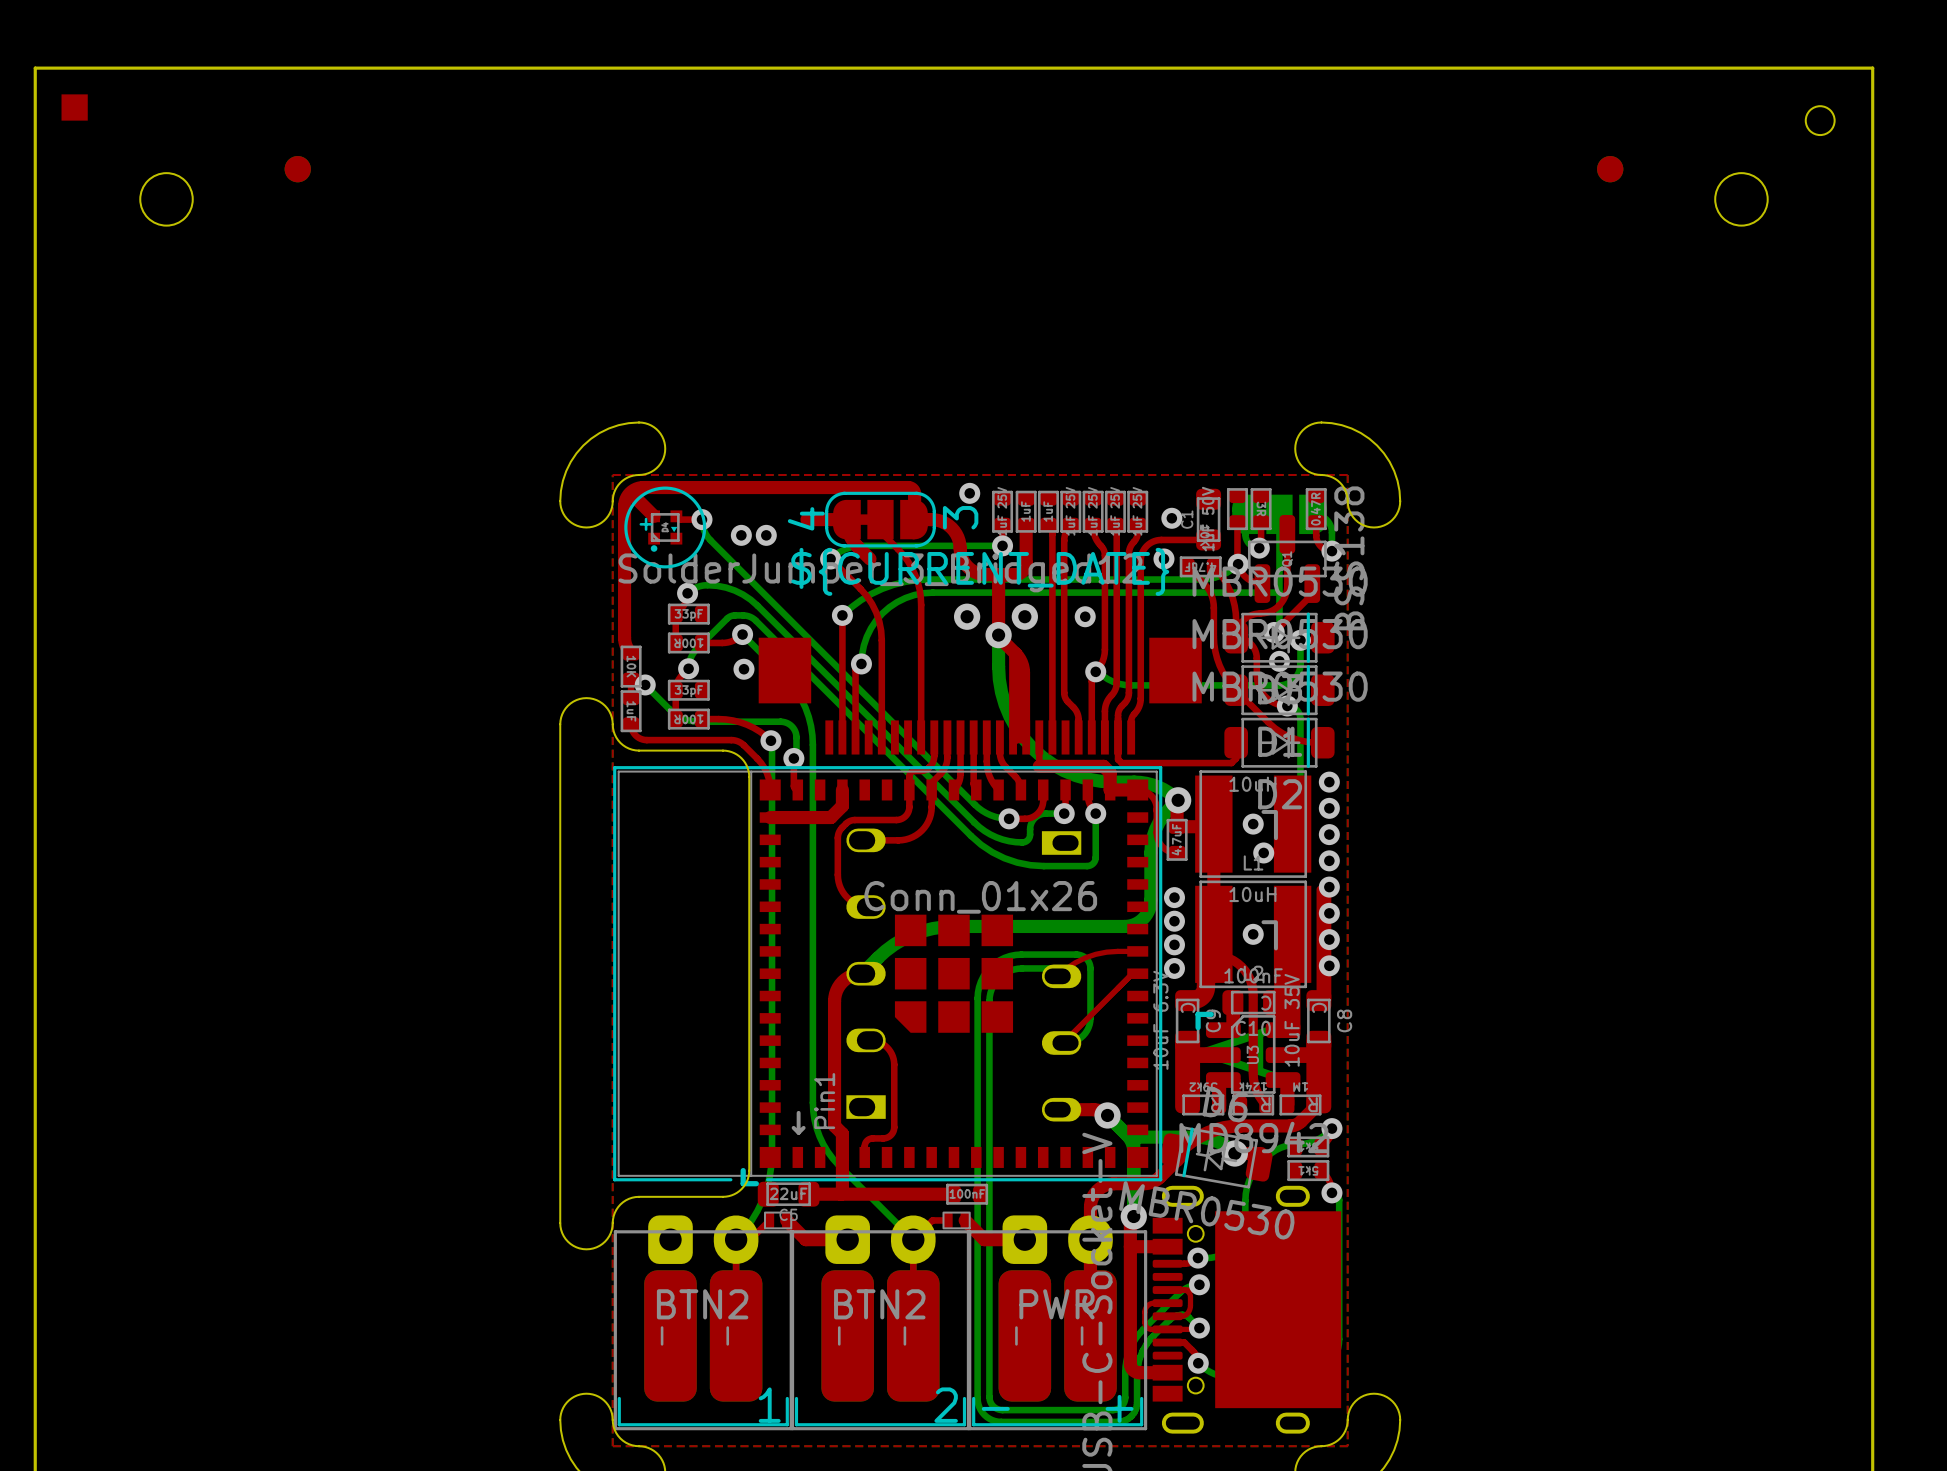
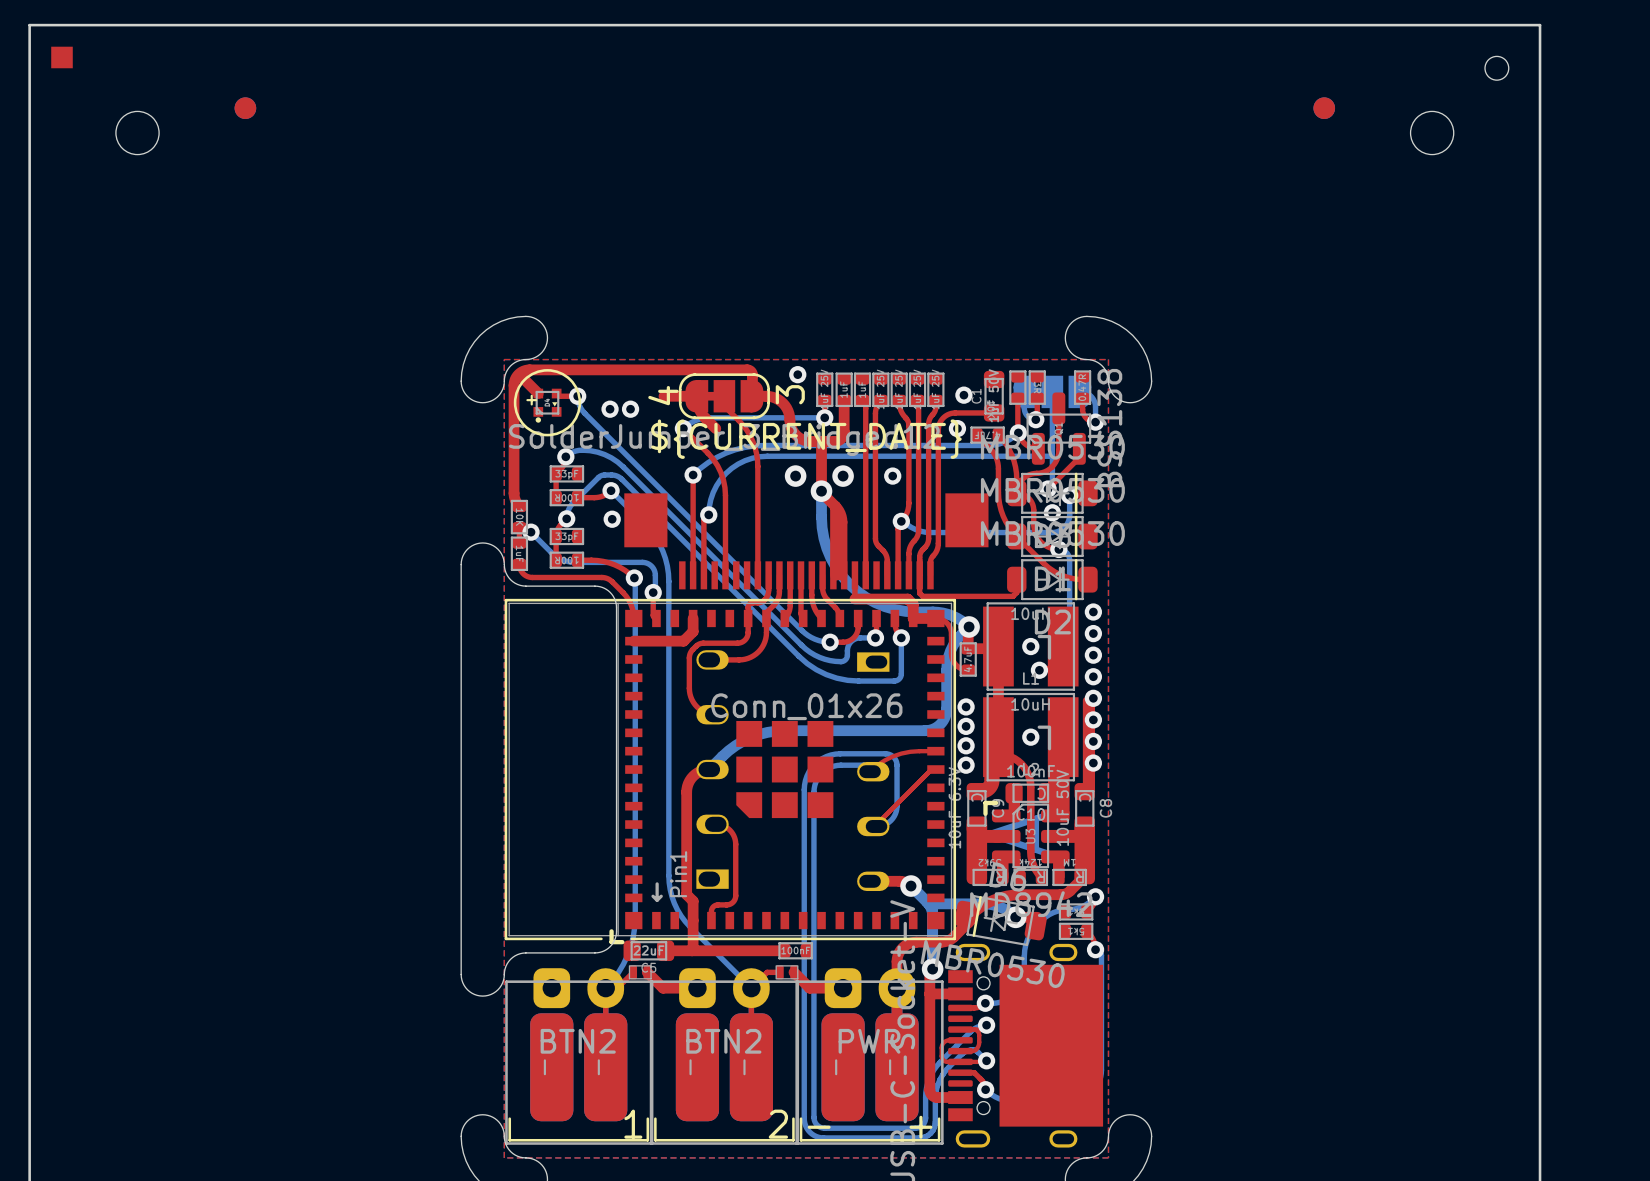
C8 value: 10uF 35V (1292, 1020) -> 10uF 50V (1062, 807)

